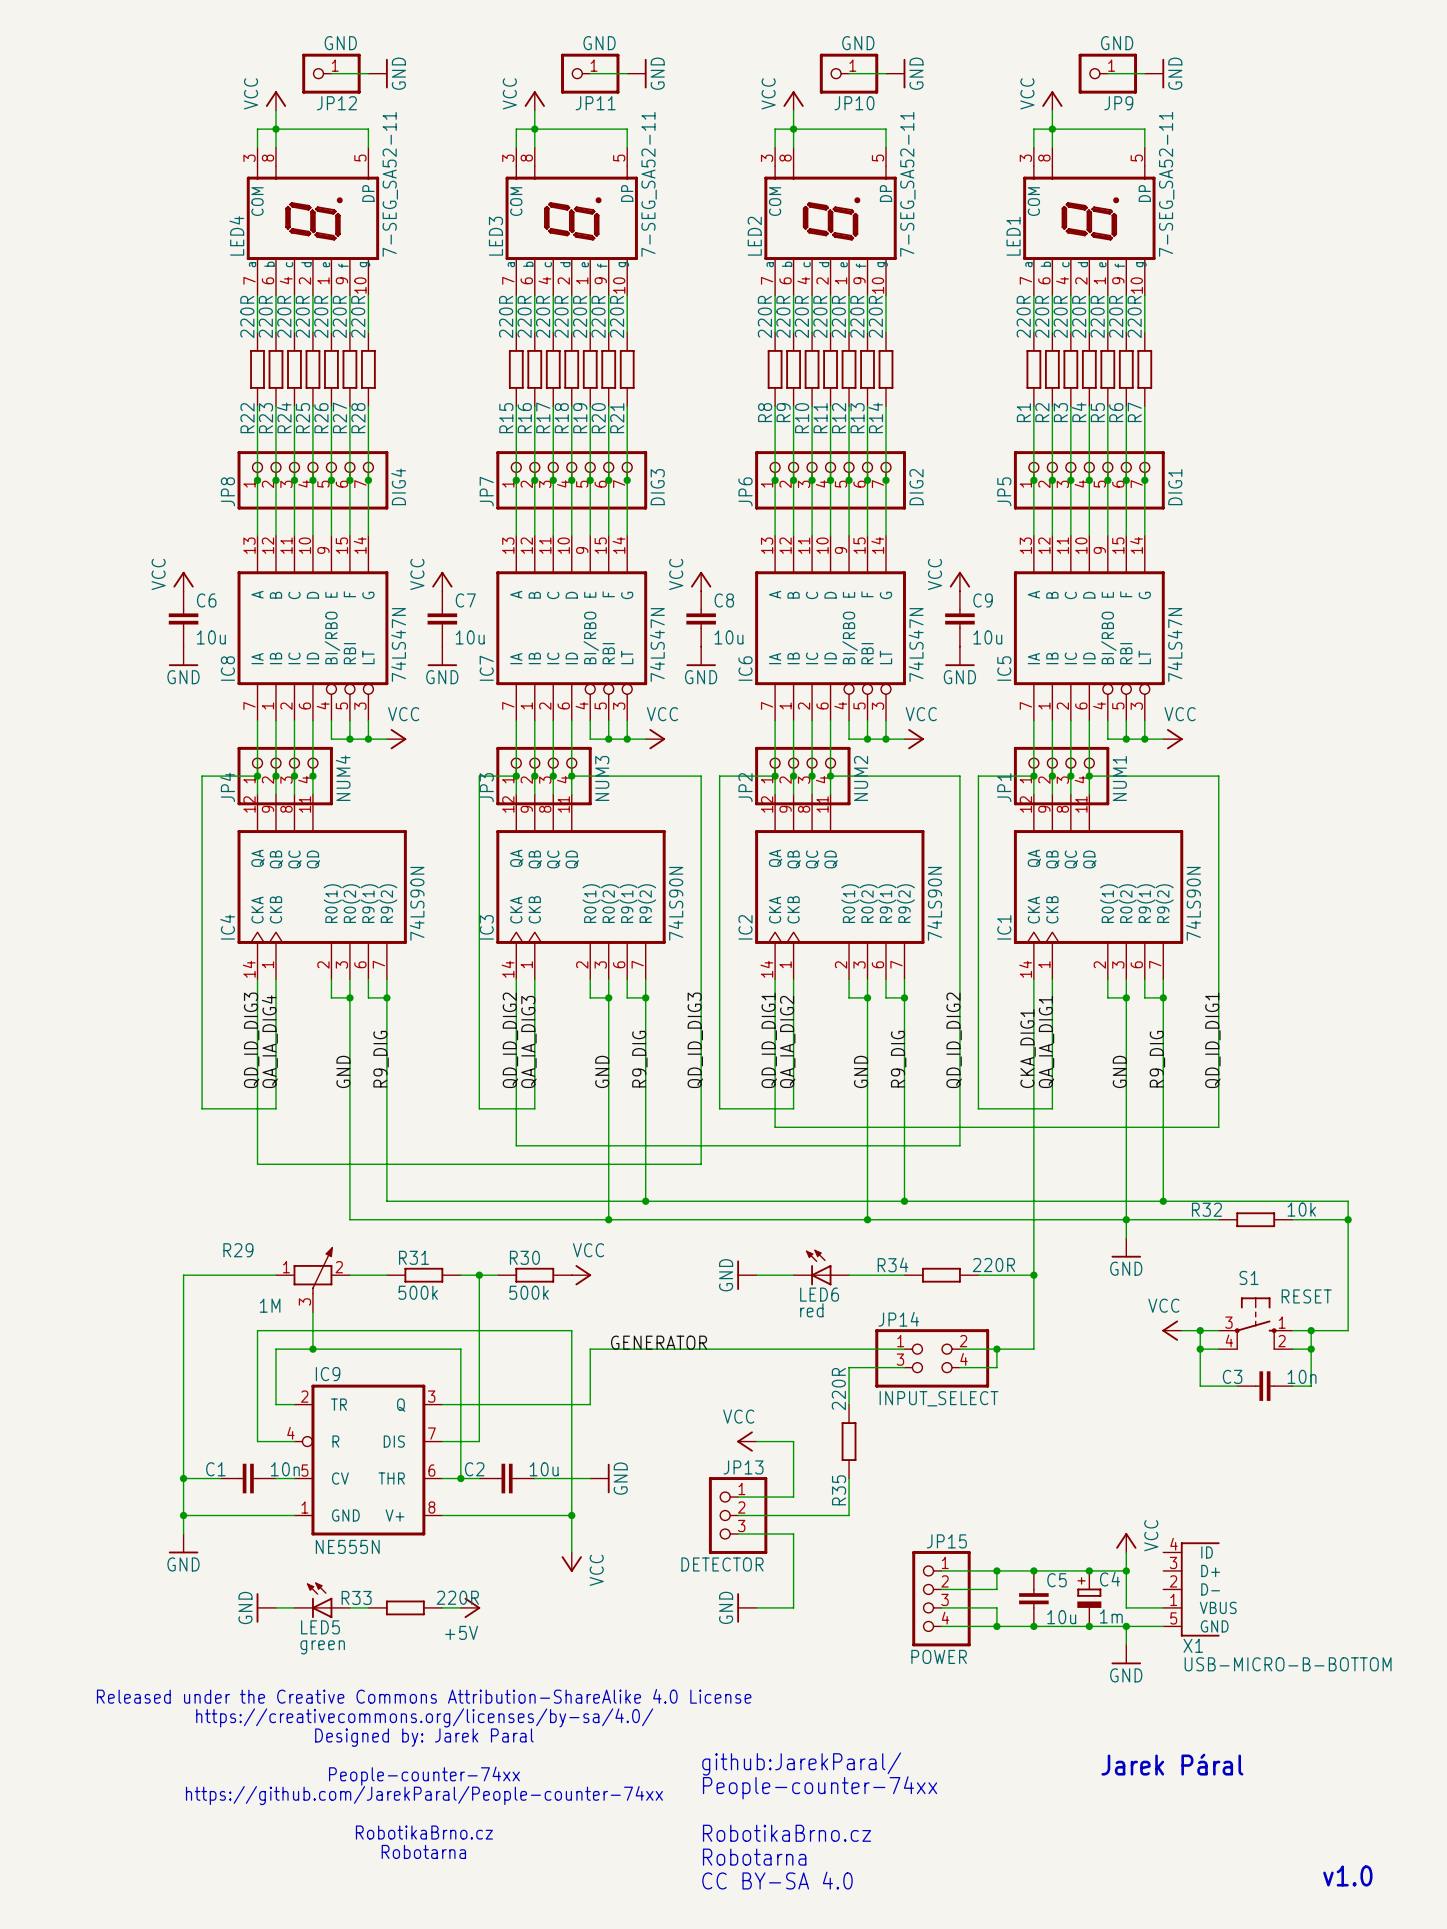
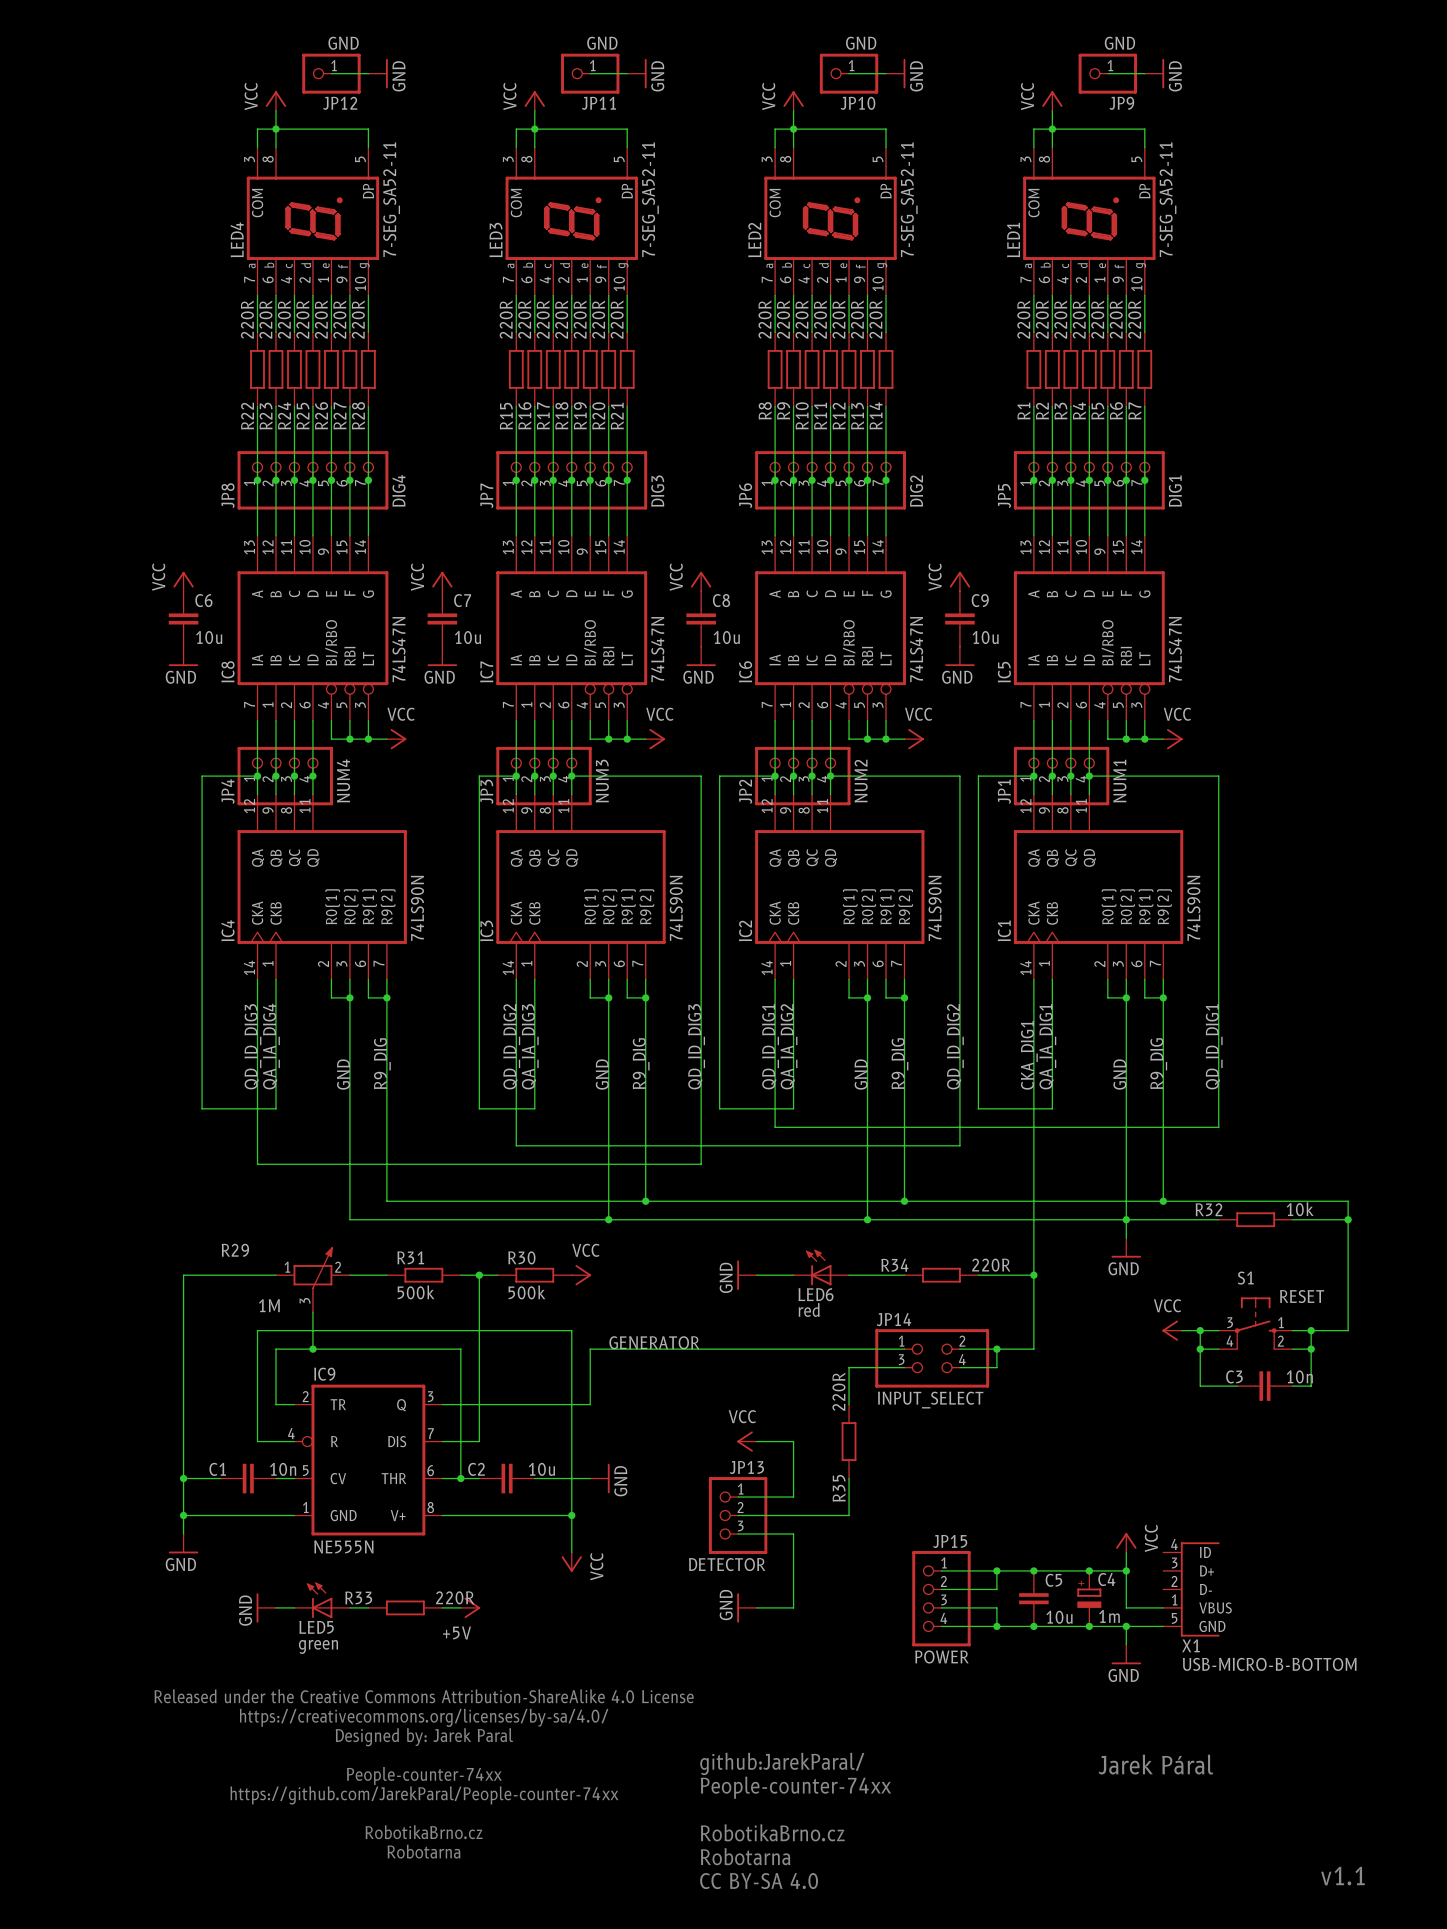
text: v1.0 (1347, 1875) -> v1.1 (1342, 1876)

